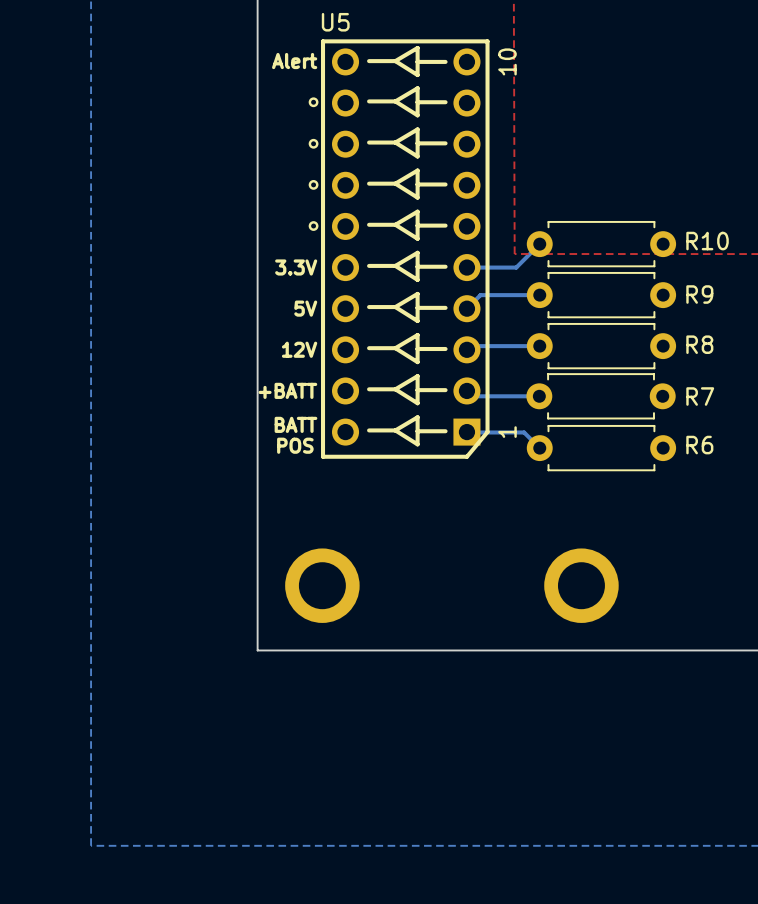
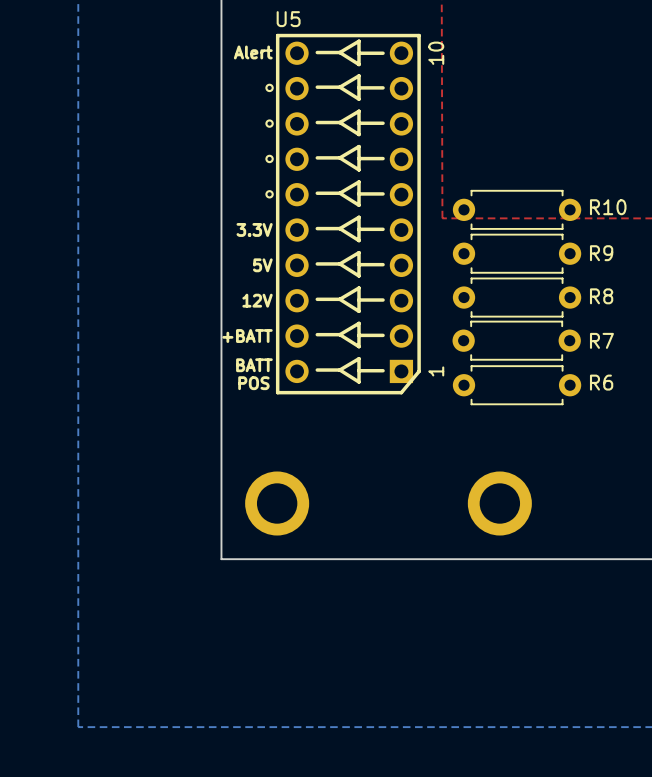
bottom track: (539, 244) (516, 267) (466, 267) -> none
bottom track: (539, 295) (480, 295) (466, 308) -> none
bottom track: (539, 346) (470, 346) (466, 349) -> none
bottom track: (466, 390) (472, 396) (539, 396) -> none
bottom track: (466, 432) (524, 432) (539, 448) -> none

